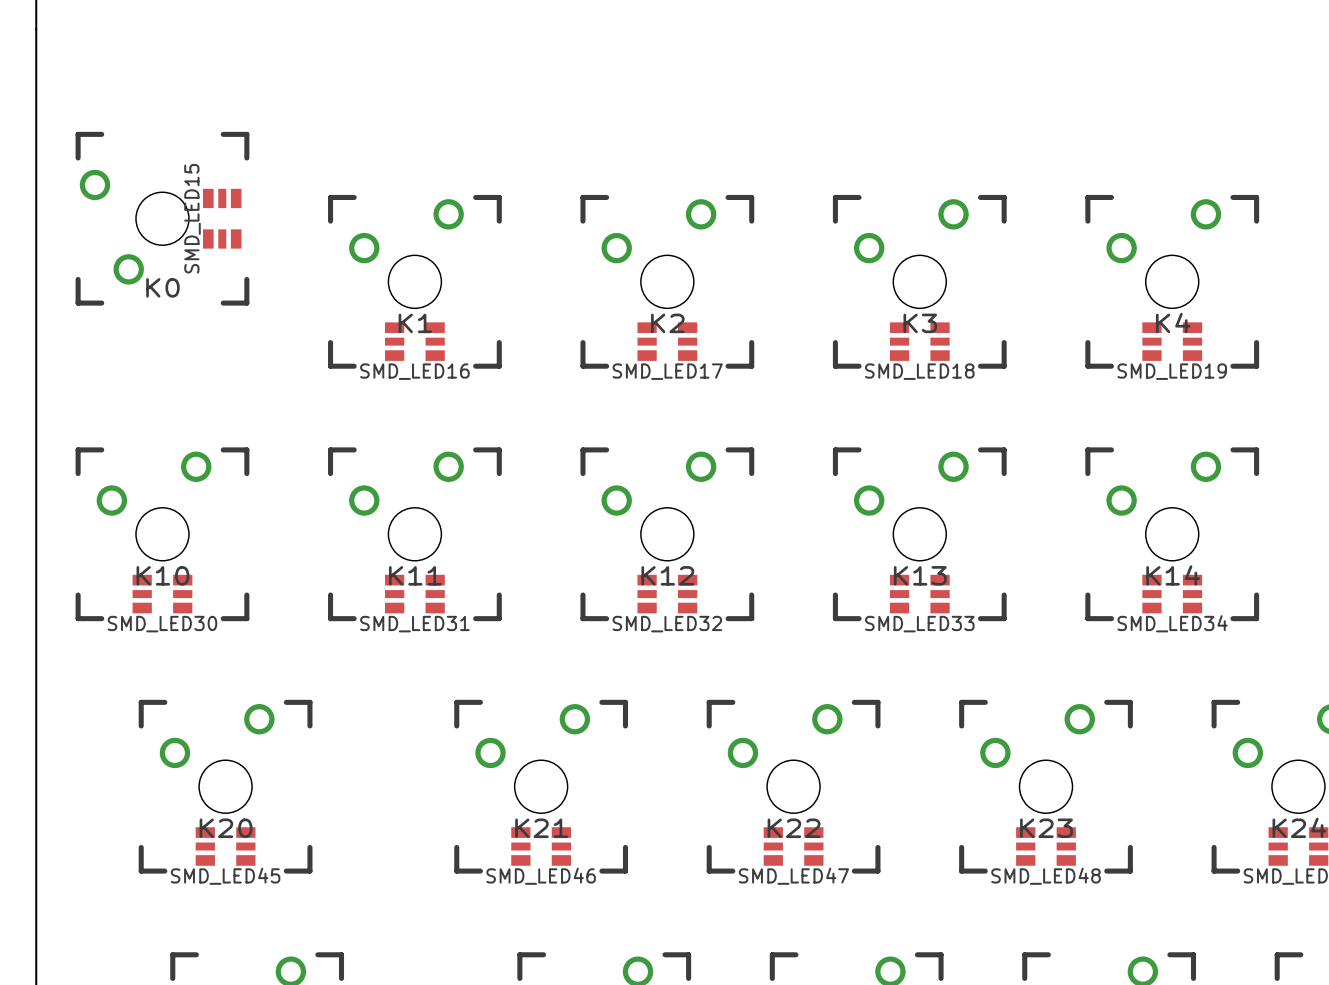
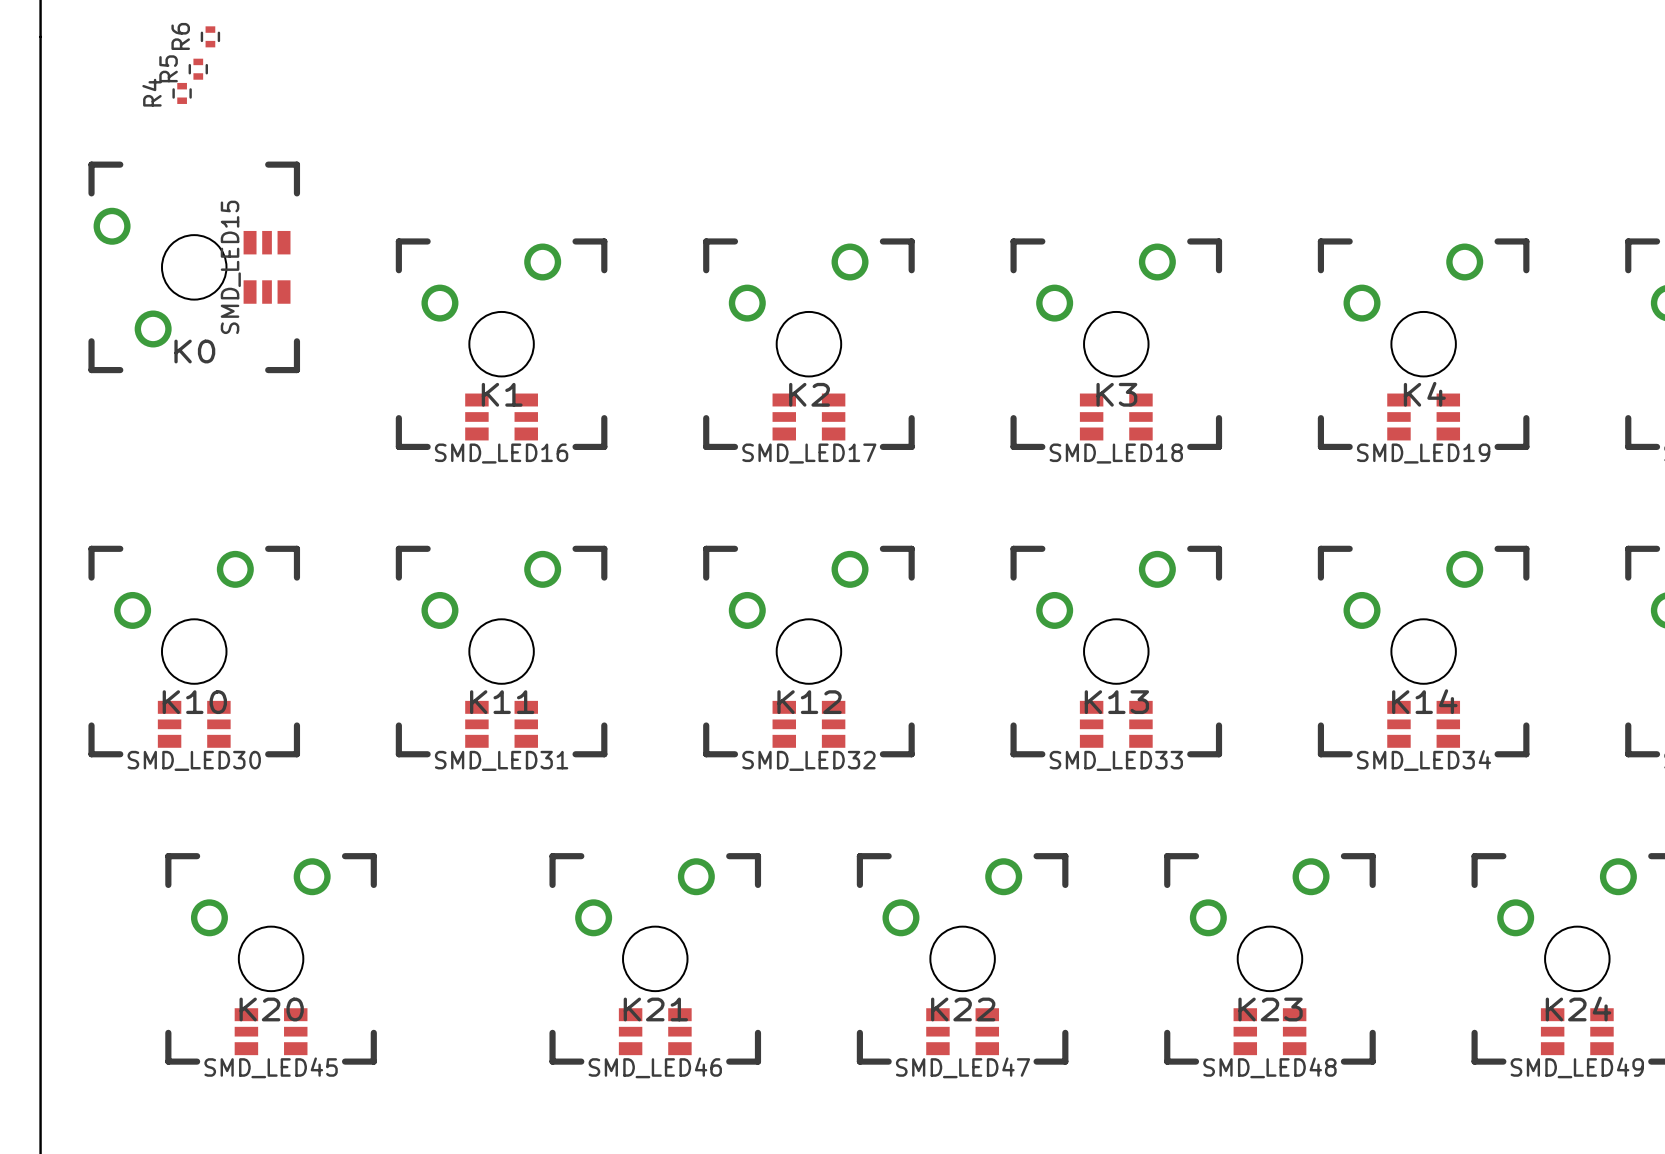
R6: none -> (210, 36)
R5: none -> (198, 69)
R4: none -> (182, 93)

